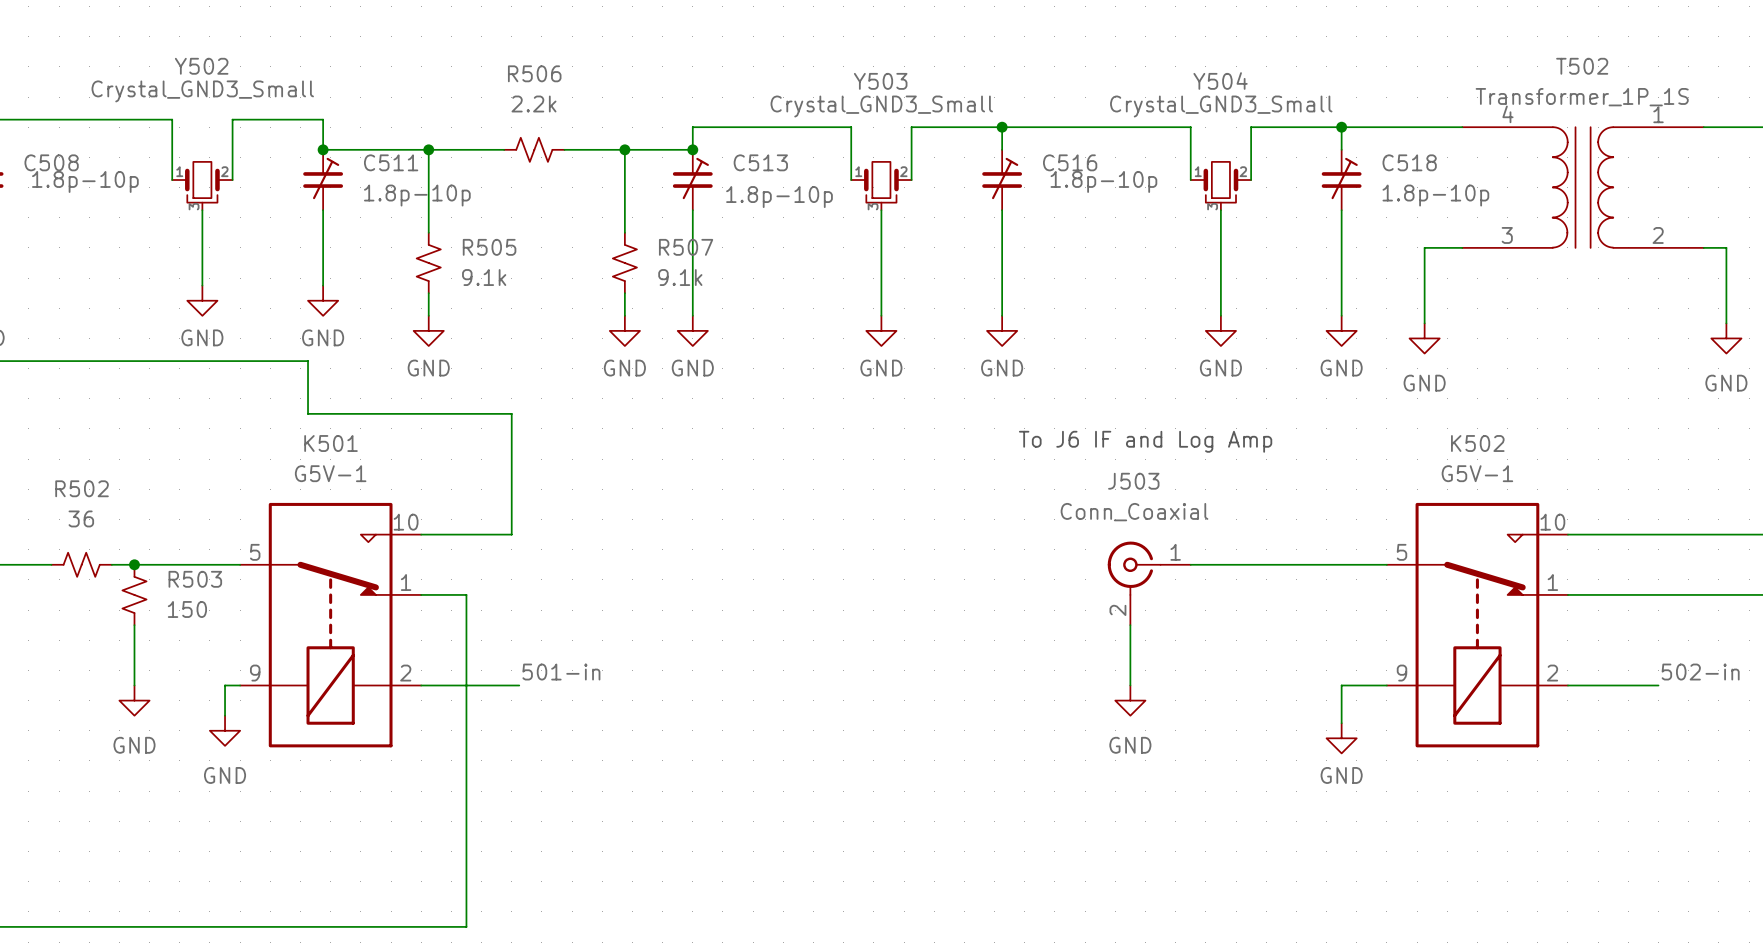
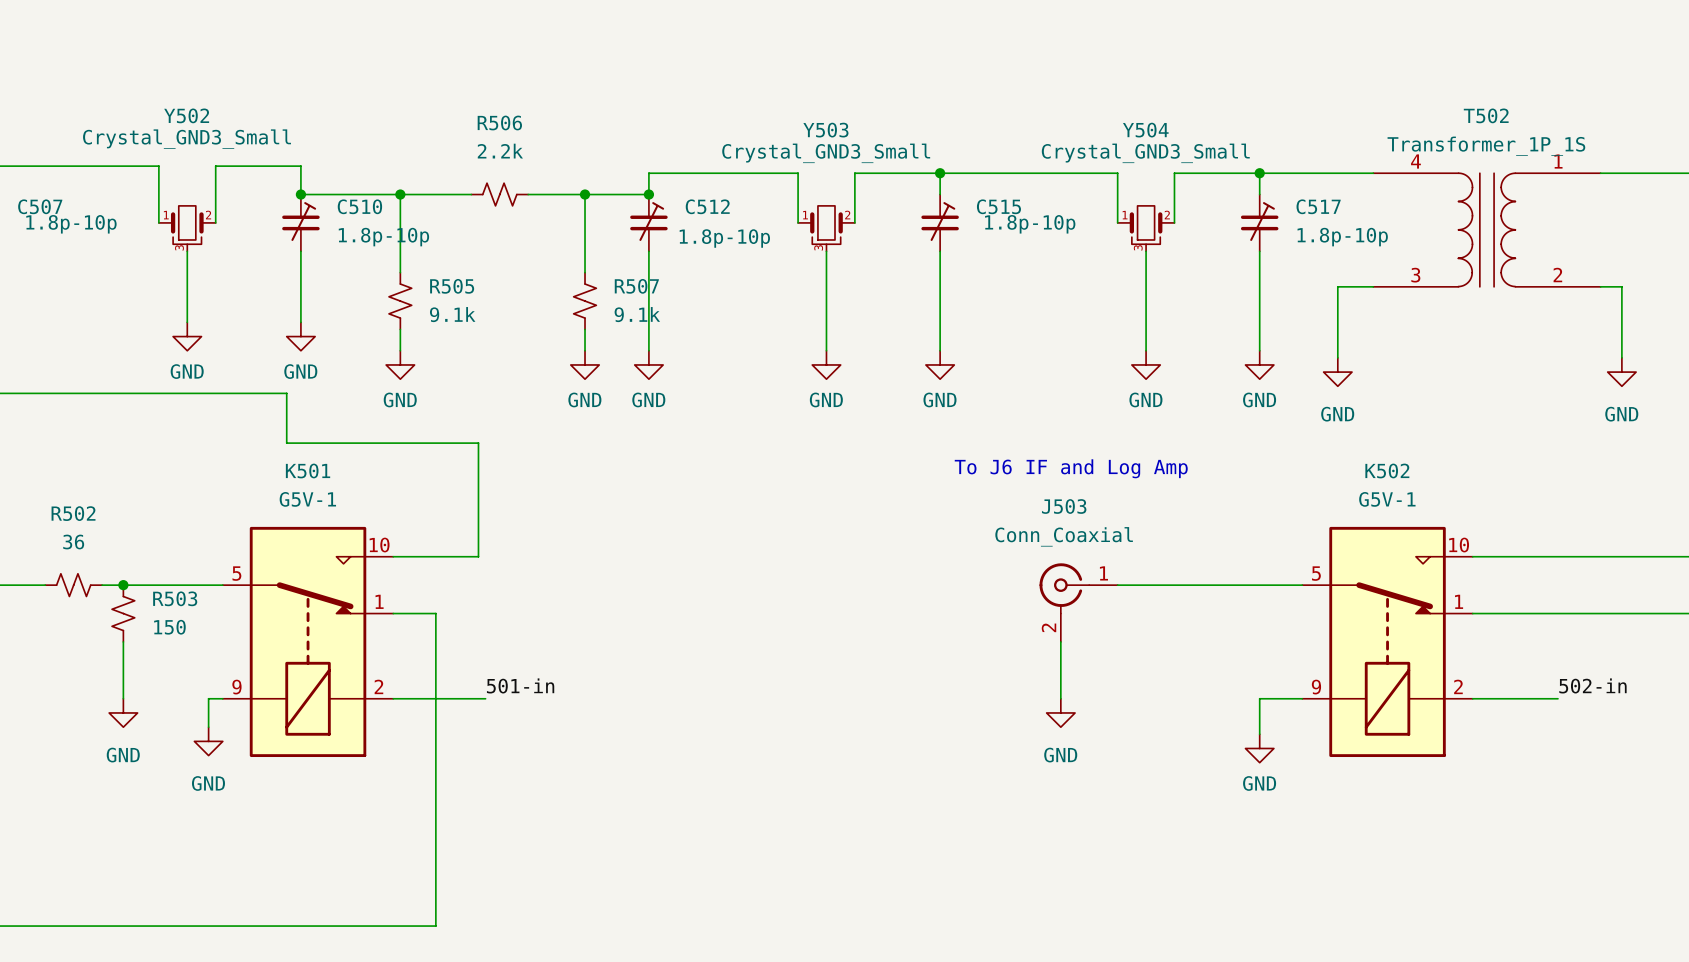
C508 name: C508 (51, 162) -> C507 (40, 206)
C511 name: C511 (391, 162) -> C510 (359, 206)
C513 name: C513 (760, 162) -> C512 (707, 206)
C516 name: C516 (1070, 162) -> C515 (998, 206)
C518 name: C518 (1409, 162) -> C517 (1318, 206)

